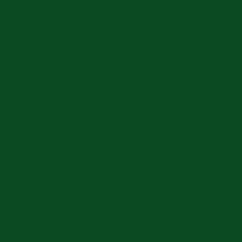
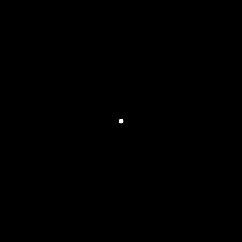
board edge: none -> (120, 120) (121, 120) (121, 121) (120, 121) (120, 120)

